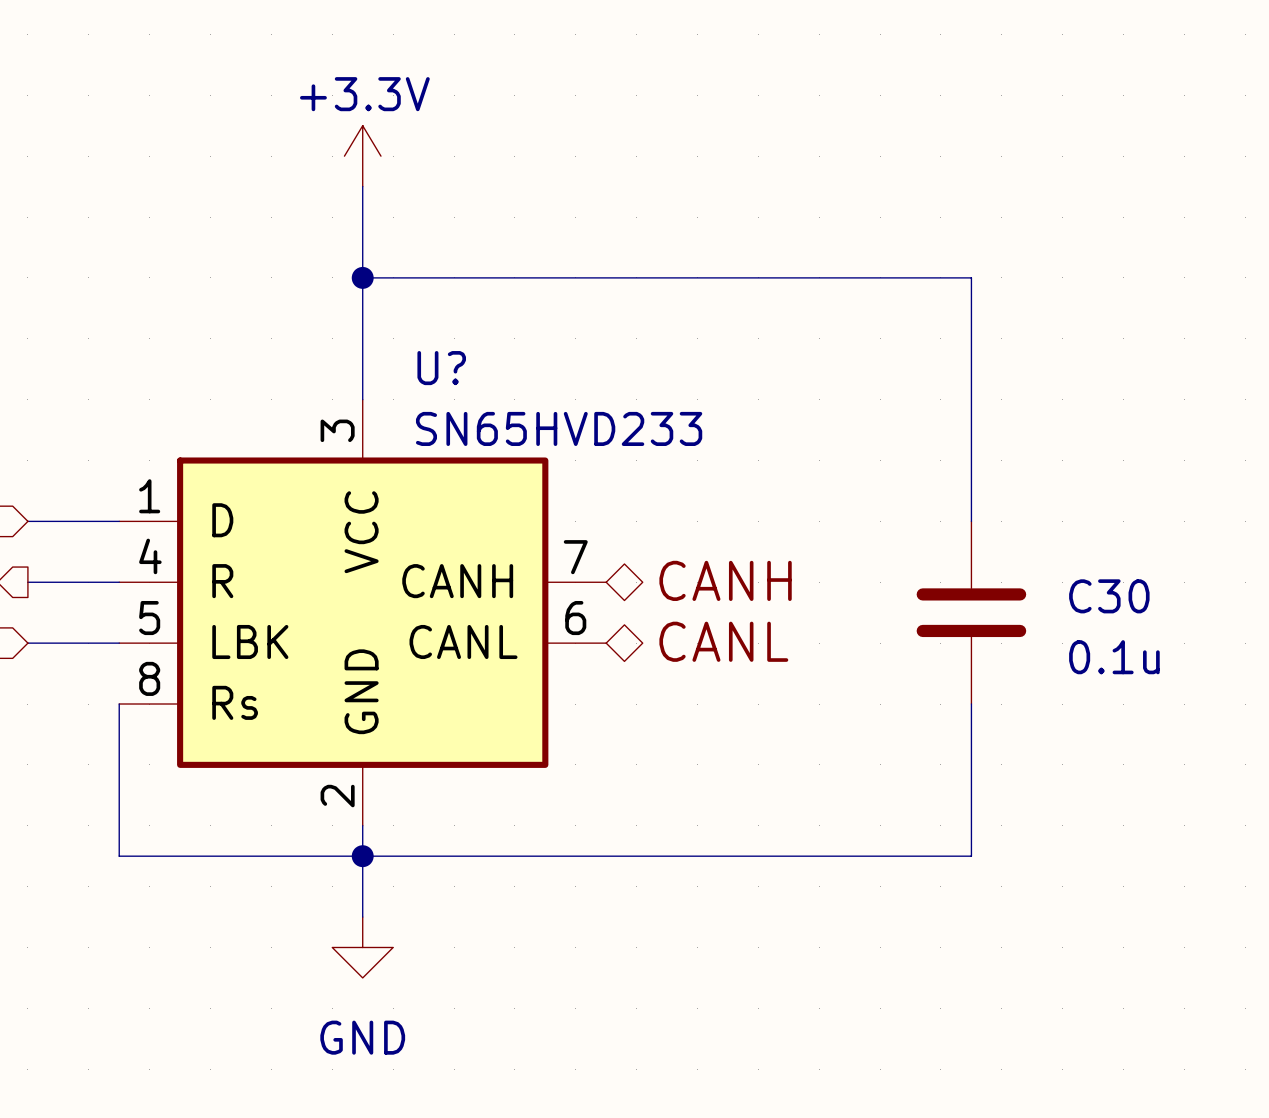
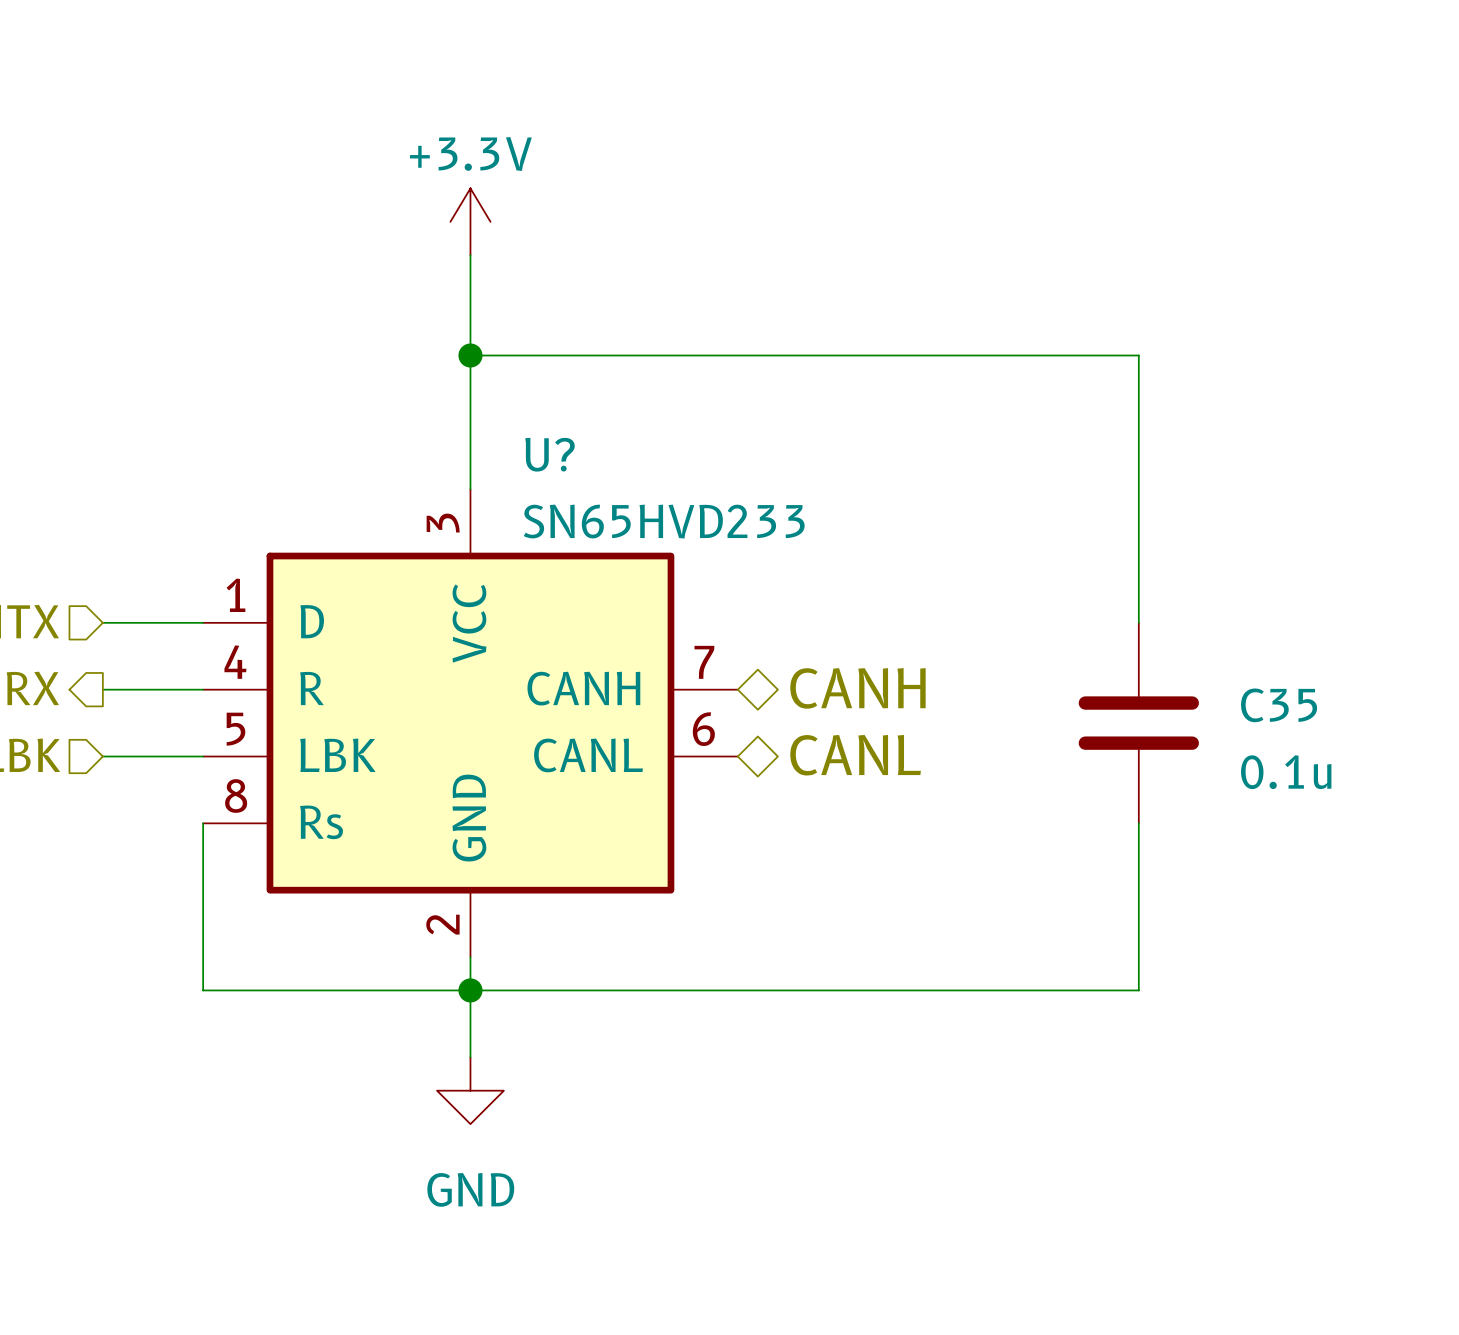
C30 name: C30 (1109, 596) -> C35 (1279, 705)

